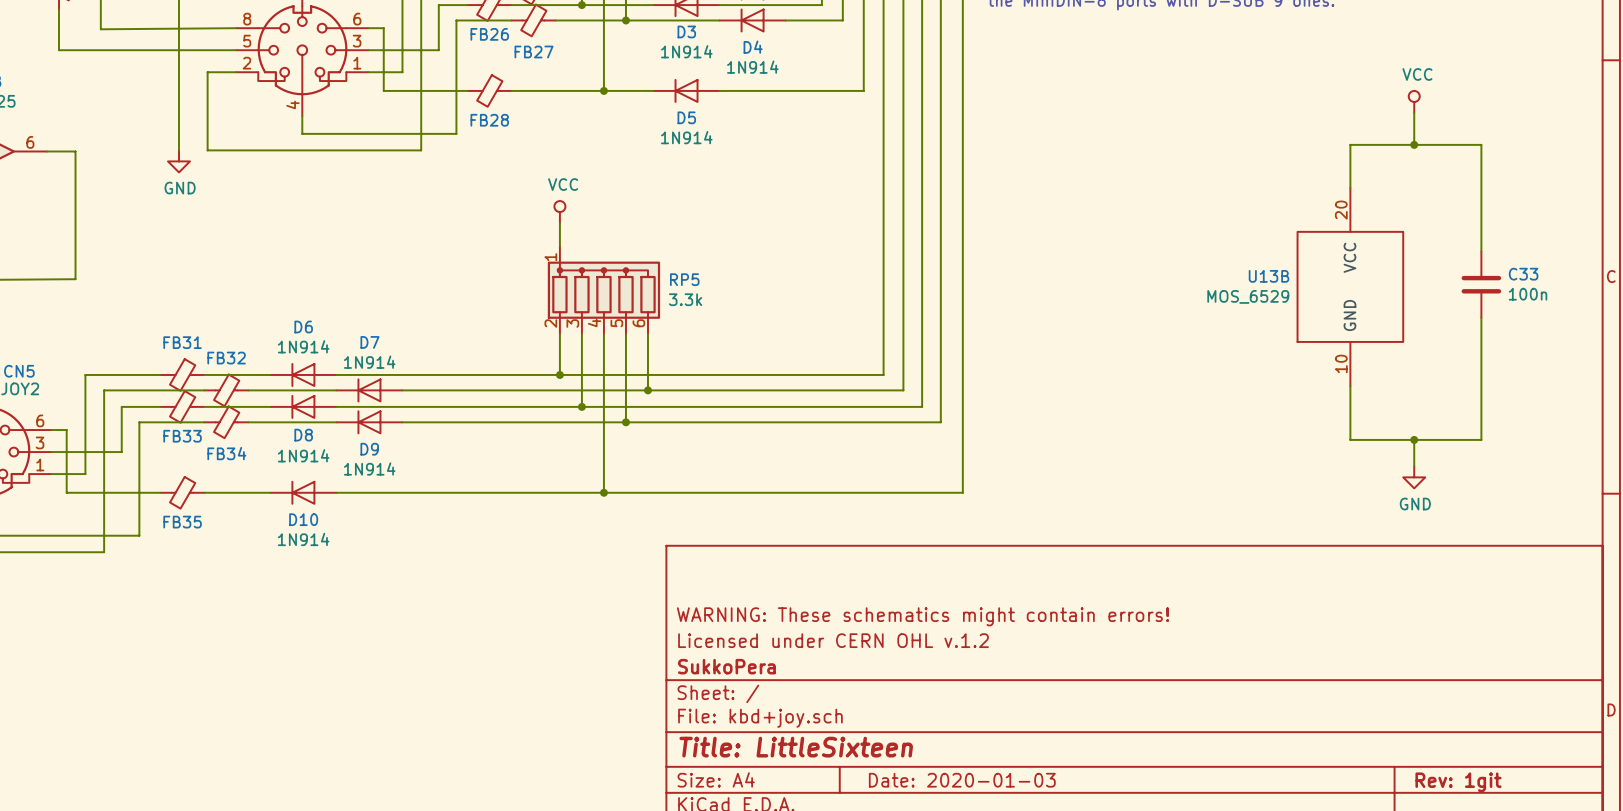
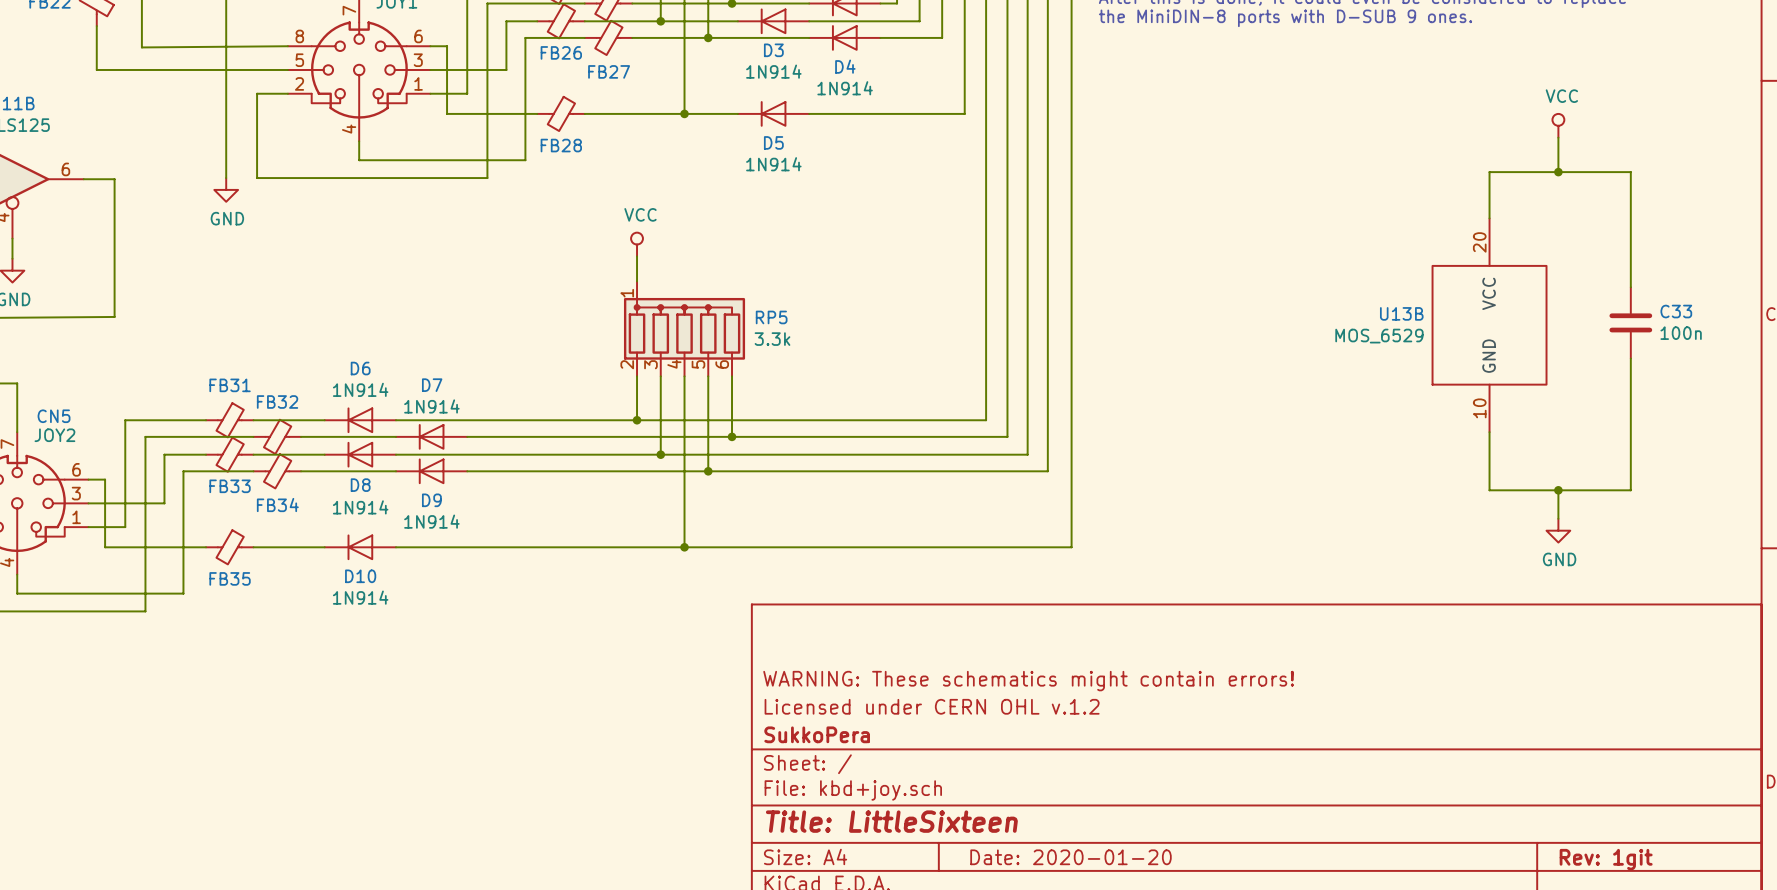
title block: Date: 2020-01-03 (962, 780) -> Date: 2020-01-20 (1071, 857)

